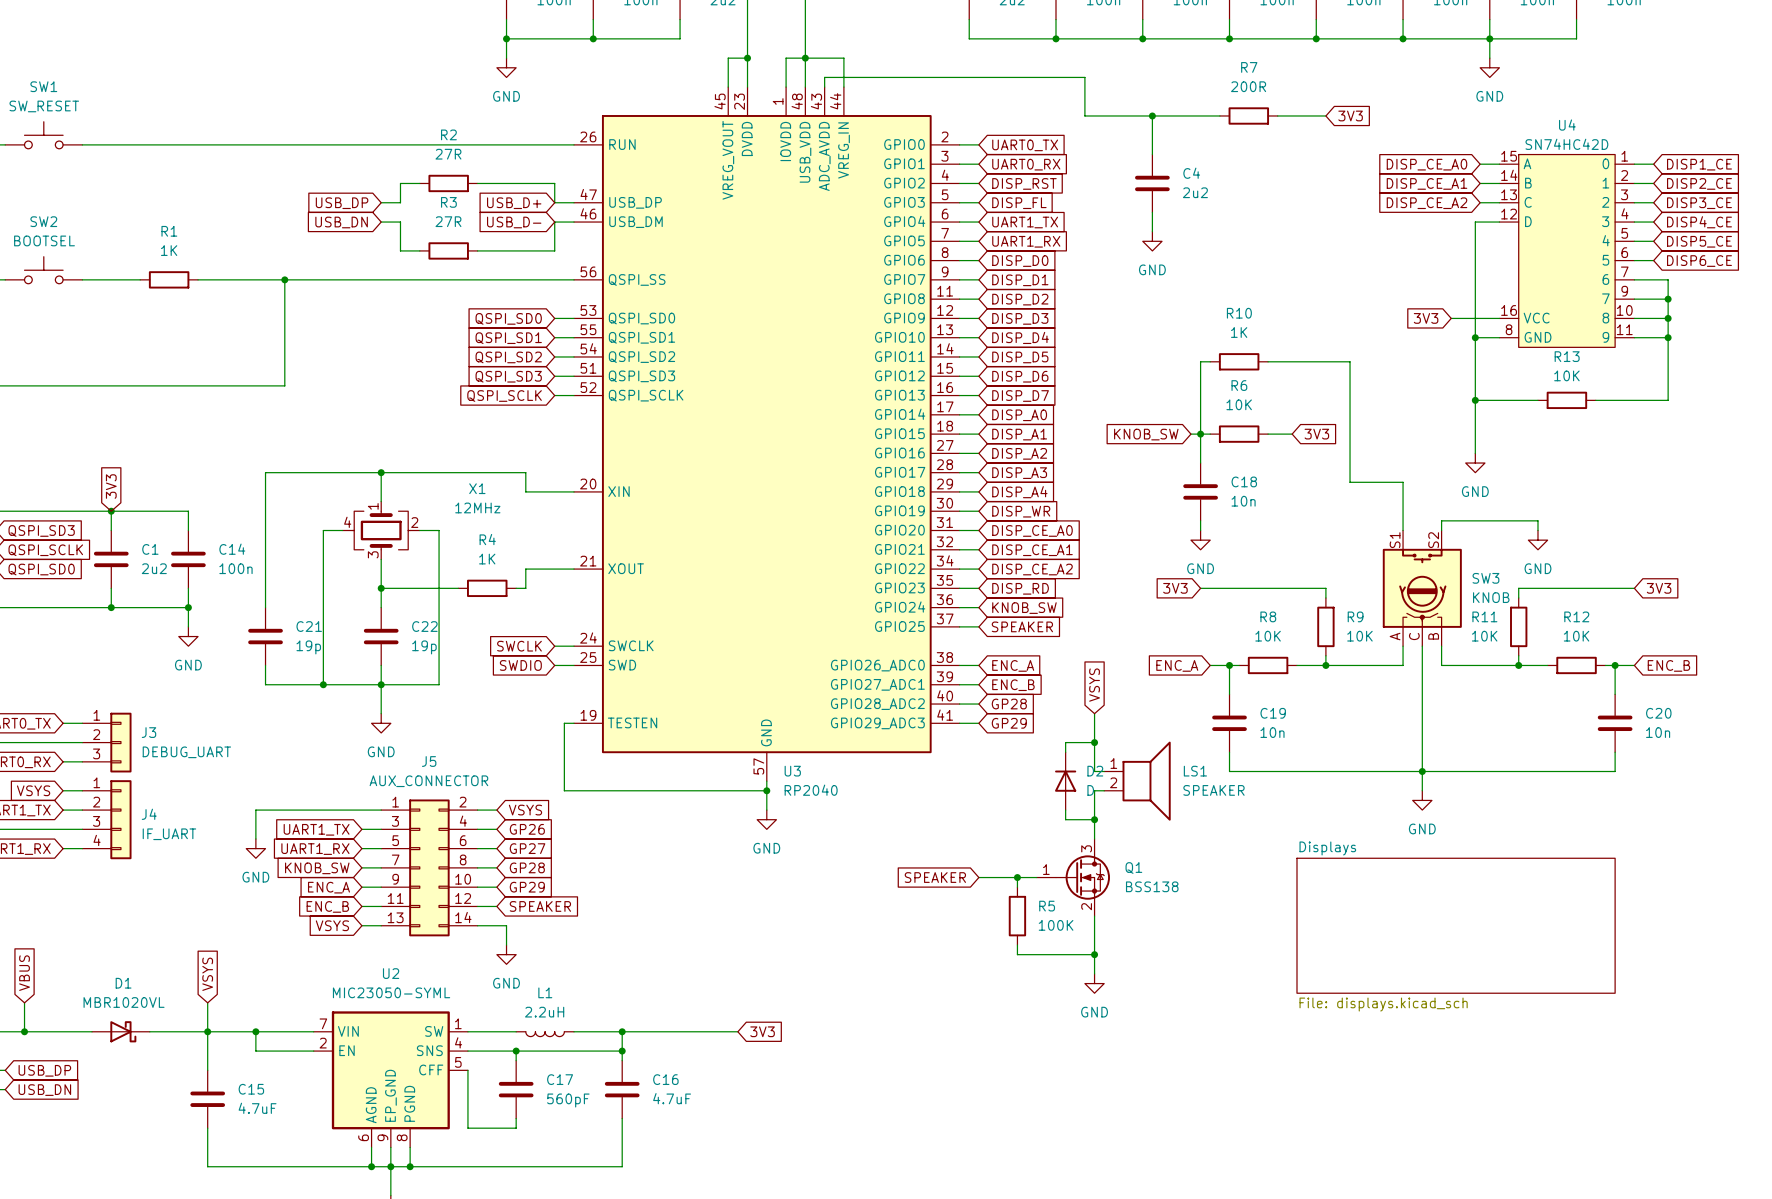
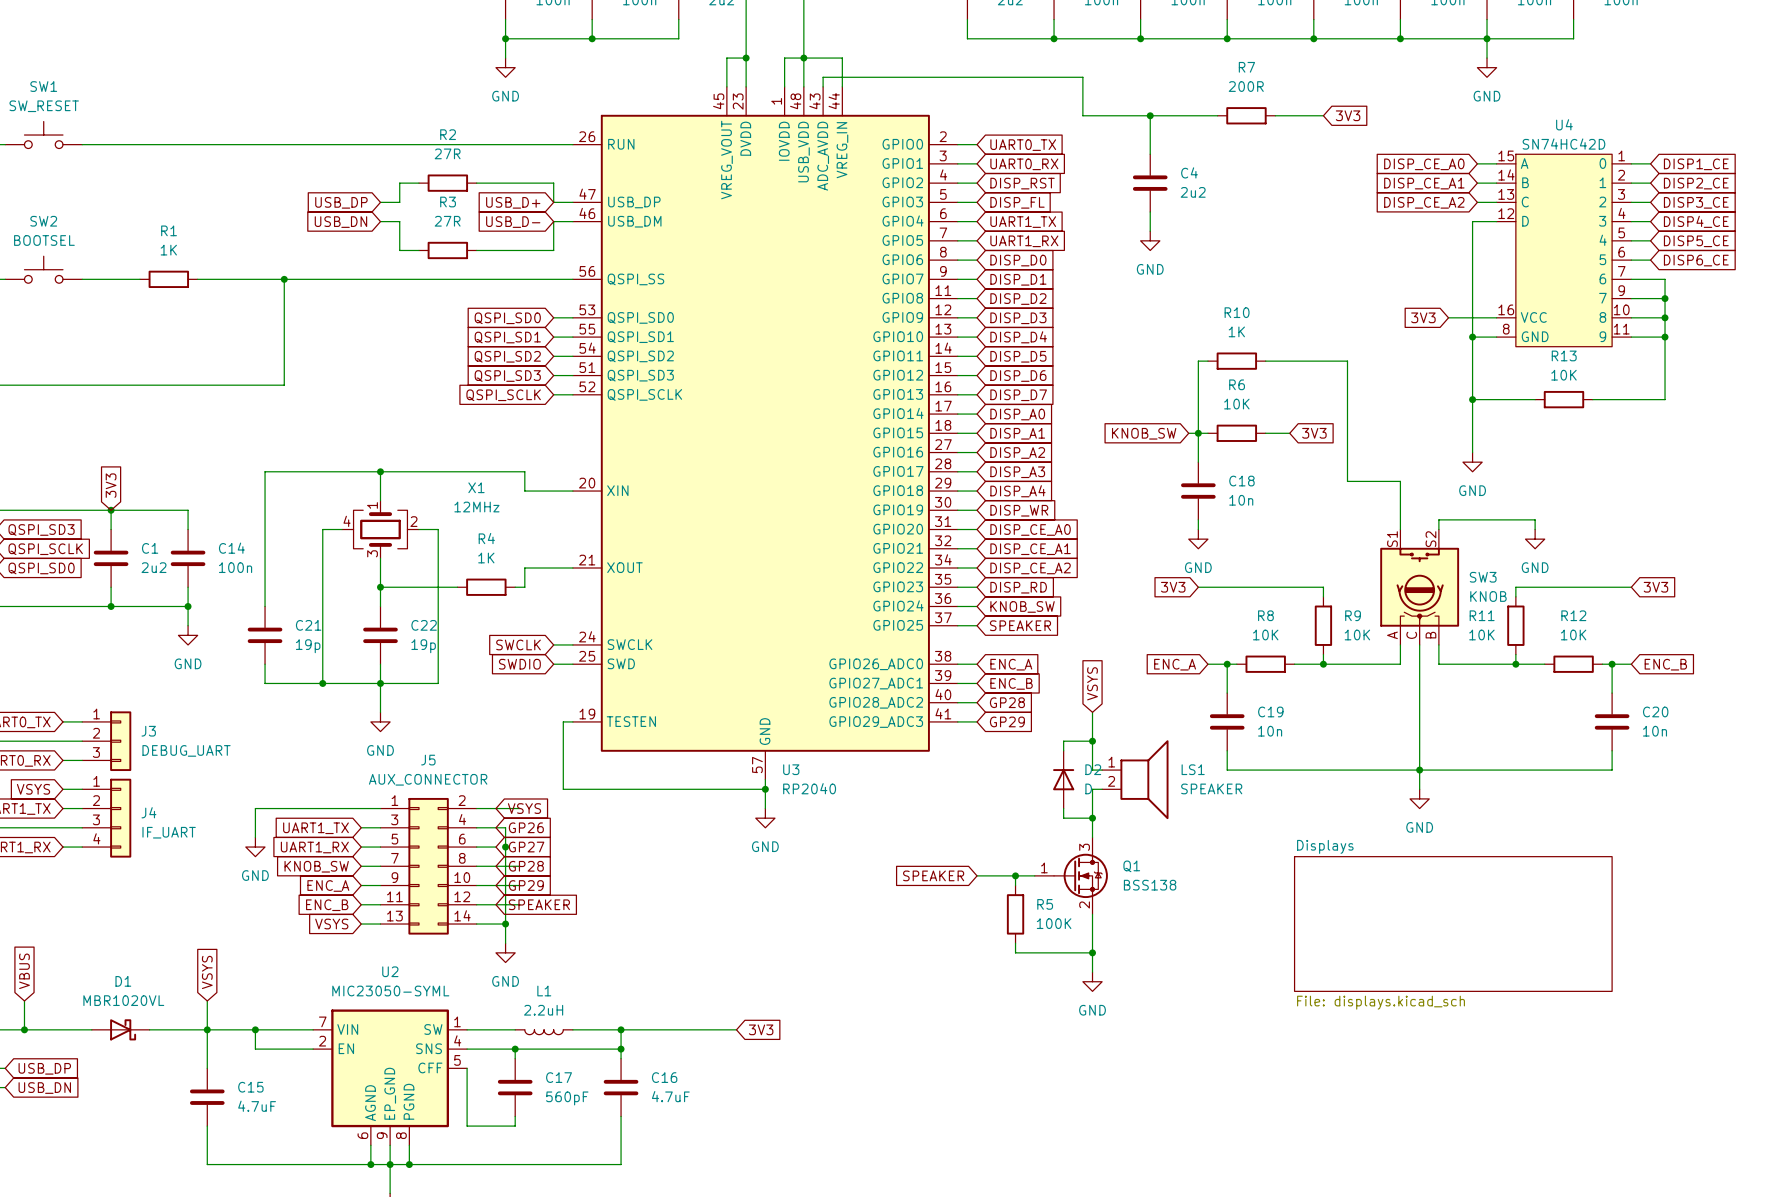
wire: none -> (495, 808) (520, 808)
wire: none -> (495, 827) (505, 827) (505, 924)
junction: none -> (505, 847)
wire: none -> (495, 866) (520, 866)
wire: none -> (495, 885) (520, 885)
wire: none -> (495, 904) (520, 904)
junction: none -> (505, 924)

